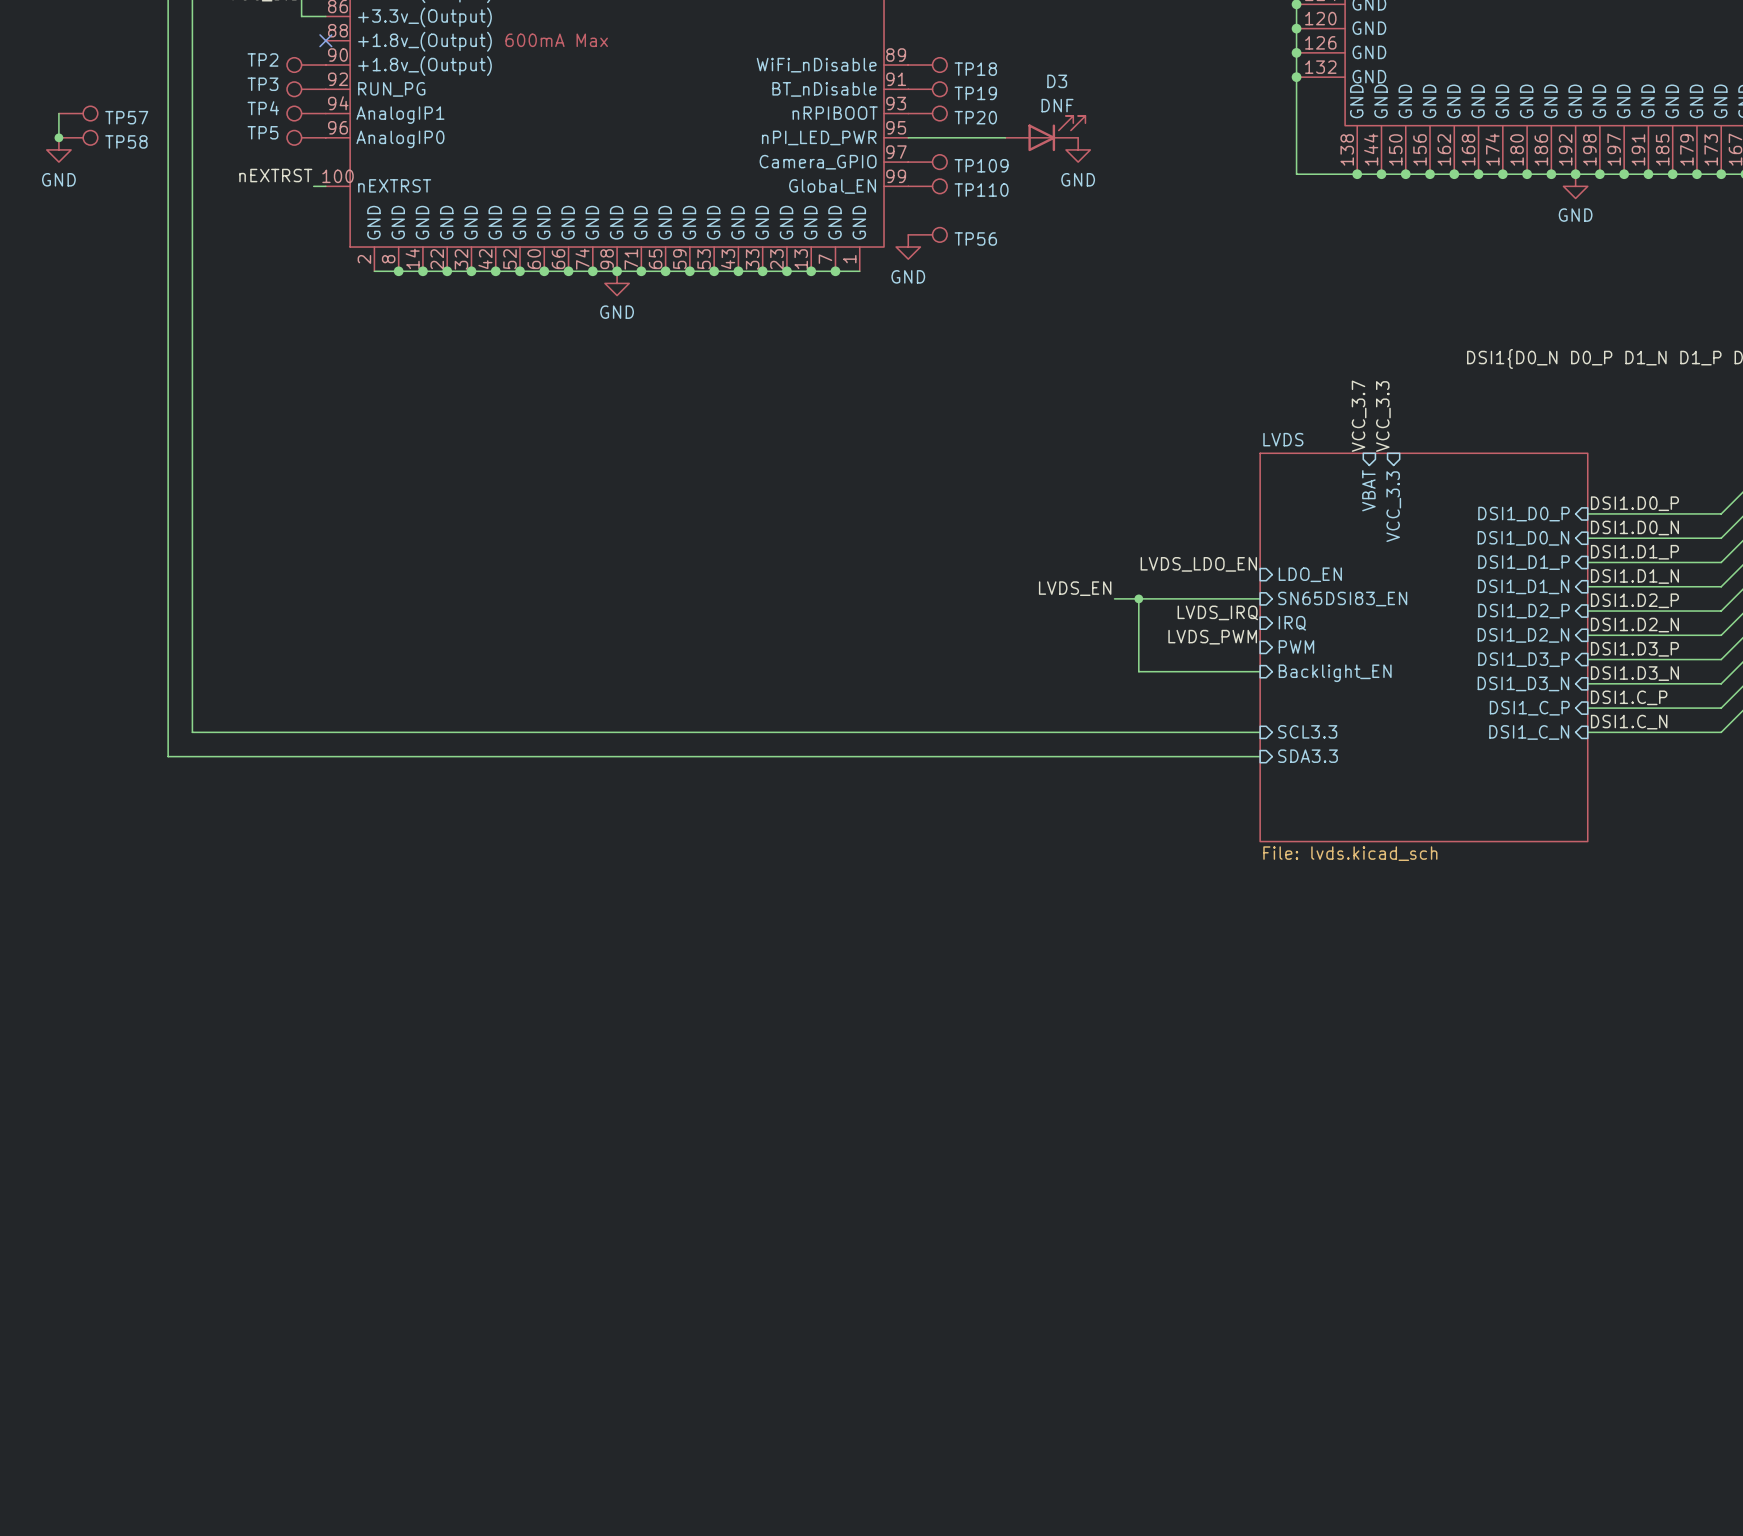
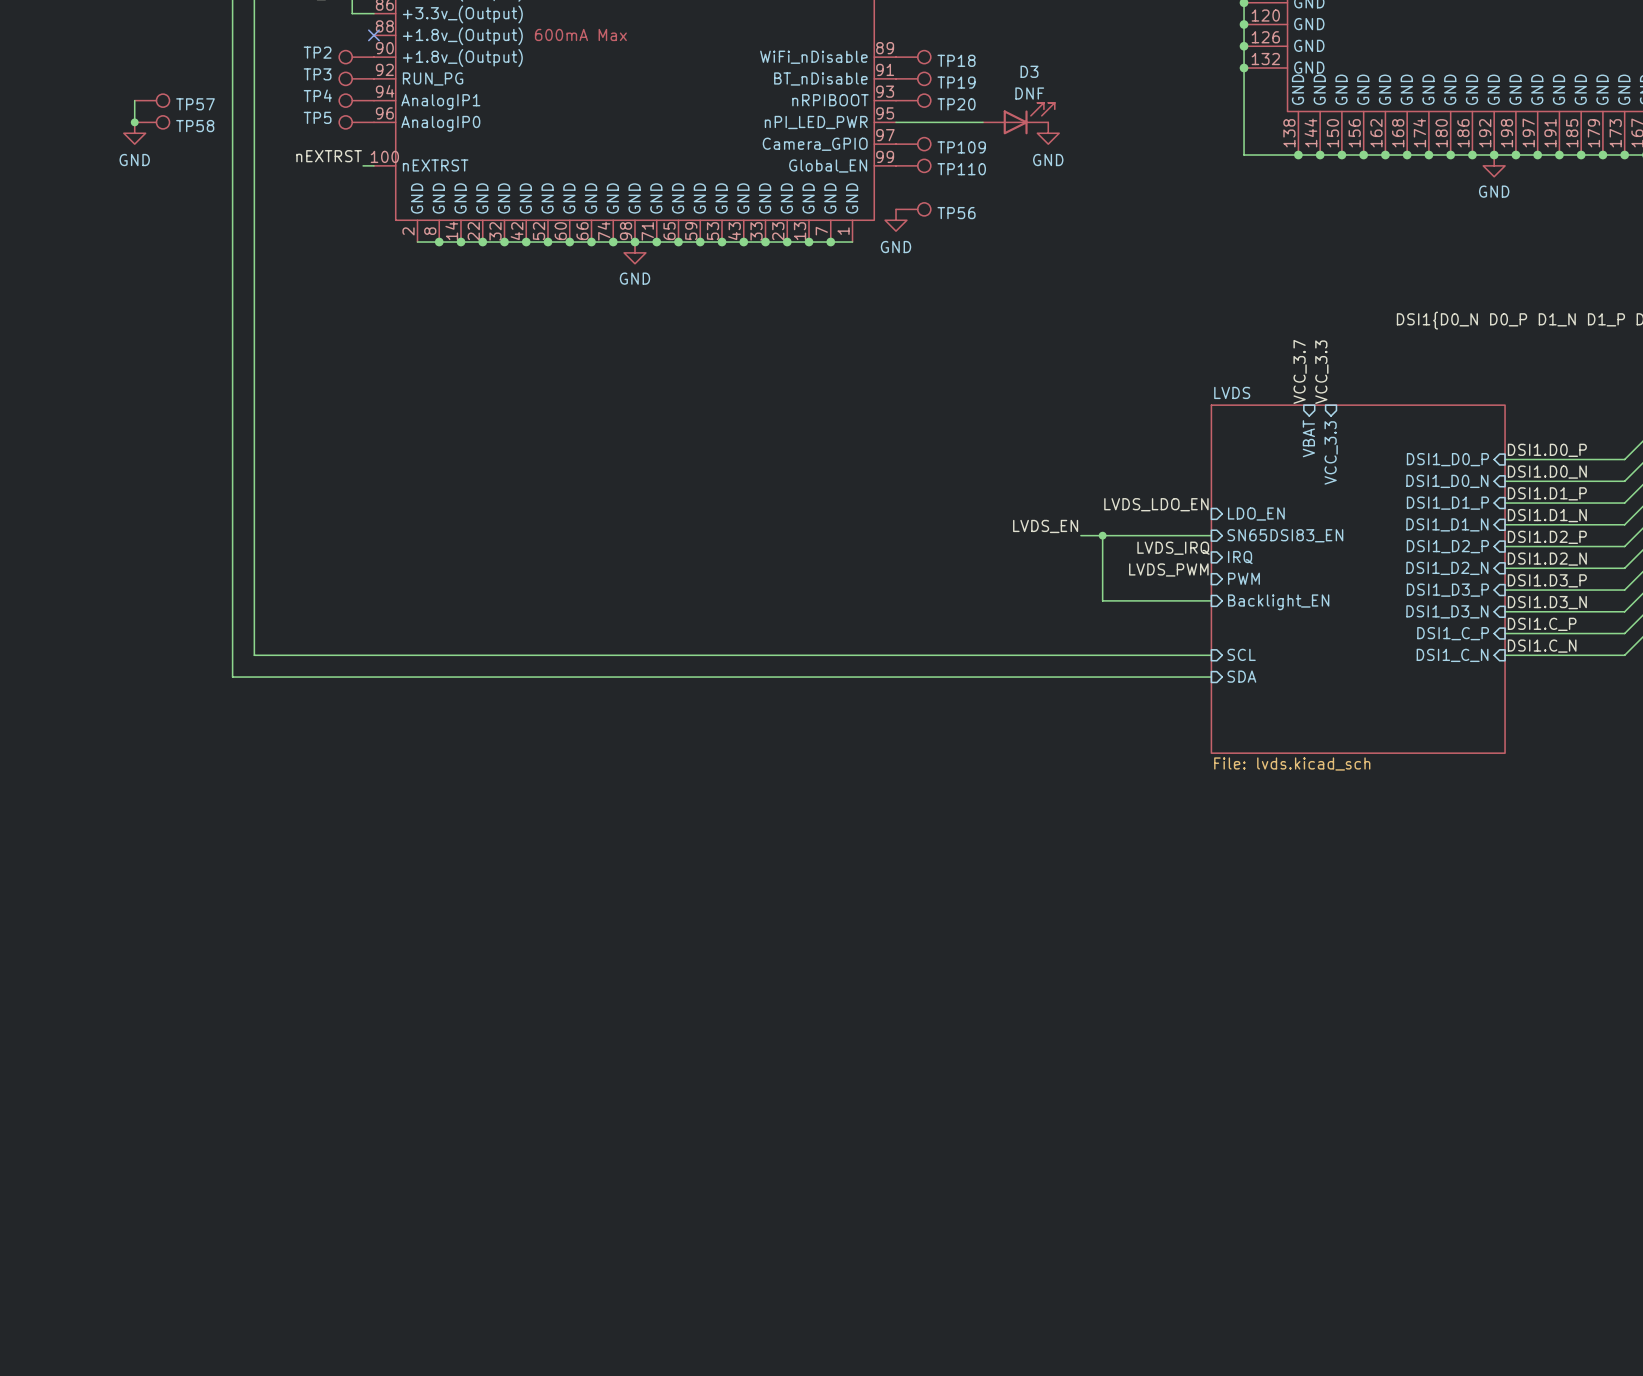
sheet pin: SCL3.3 (1307, 731) -> SCL (1241, 654)
sheet pin: SDA3.3 (1308, 756) -> SDA (1241, 676)

